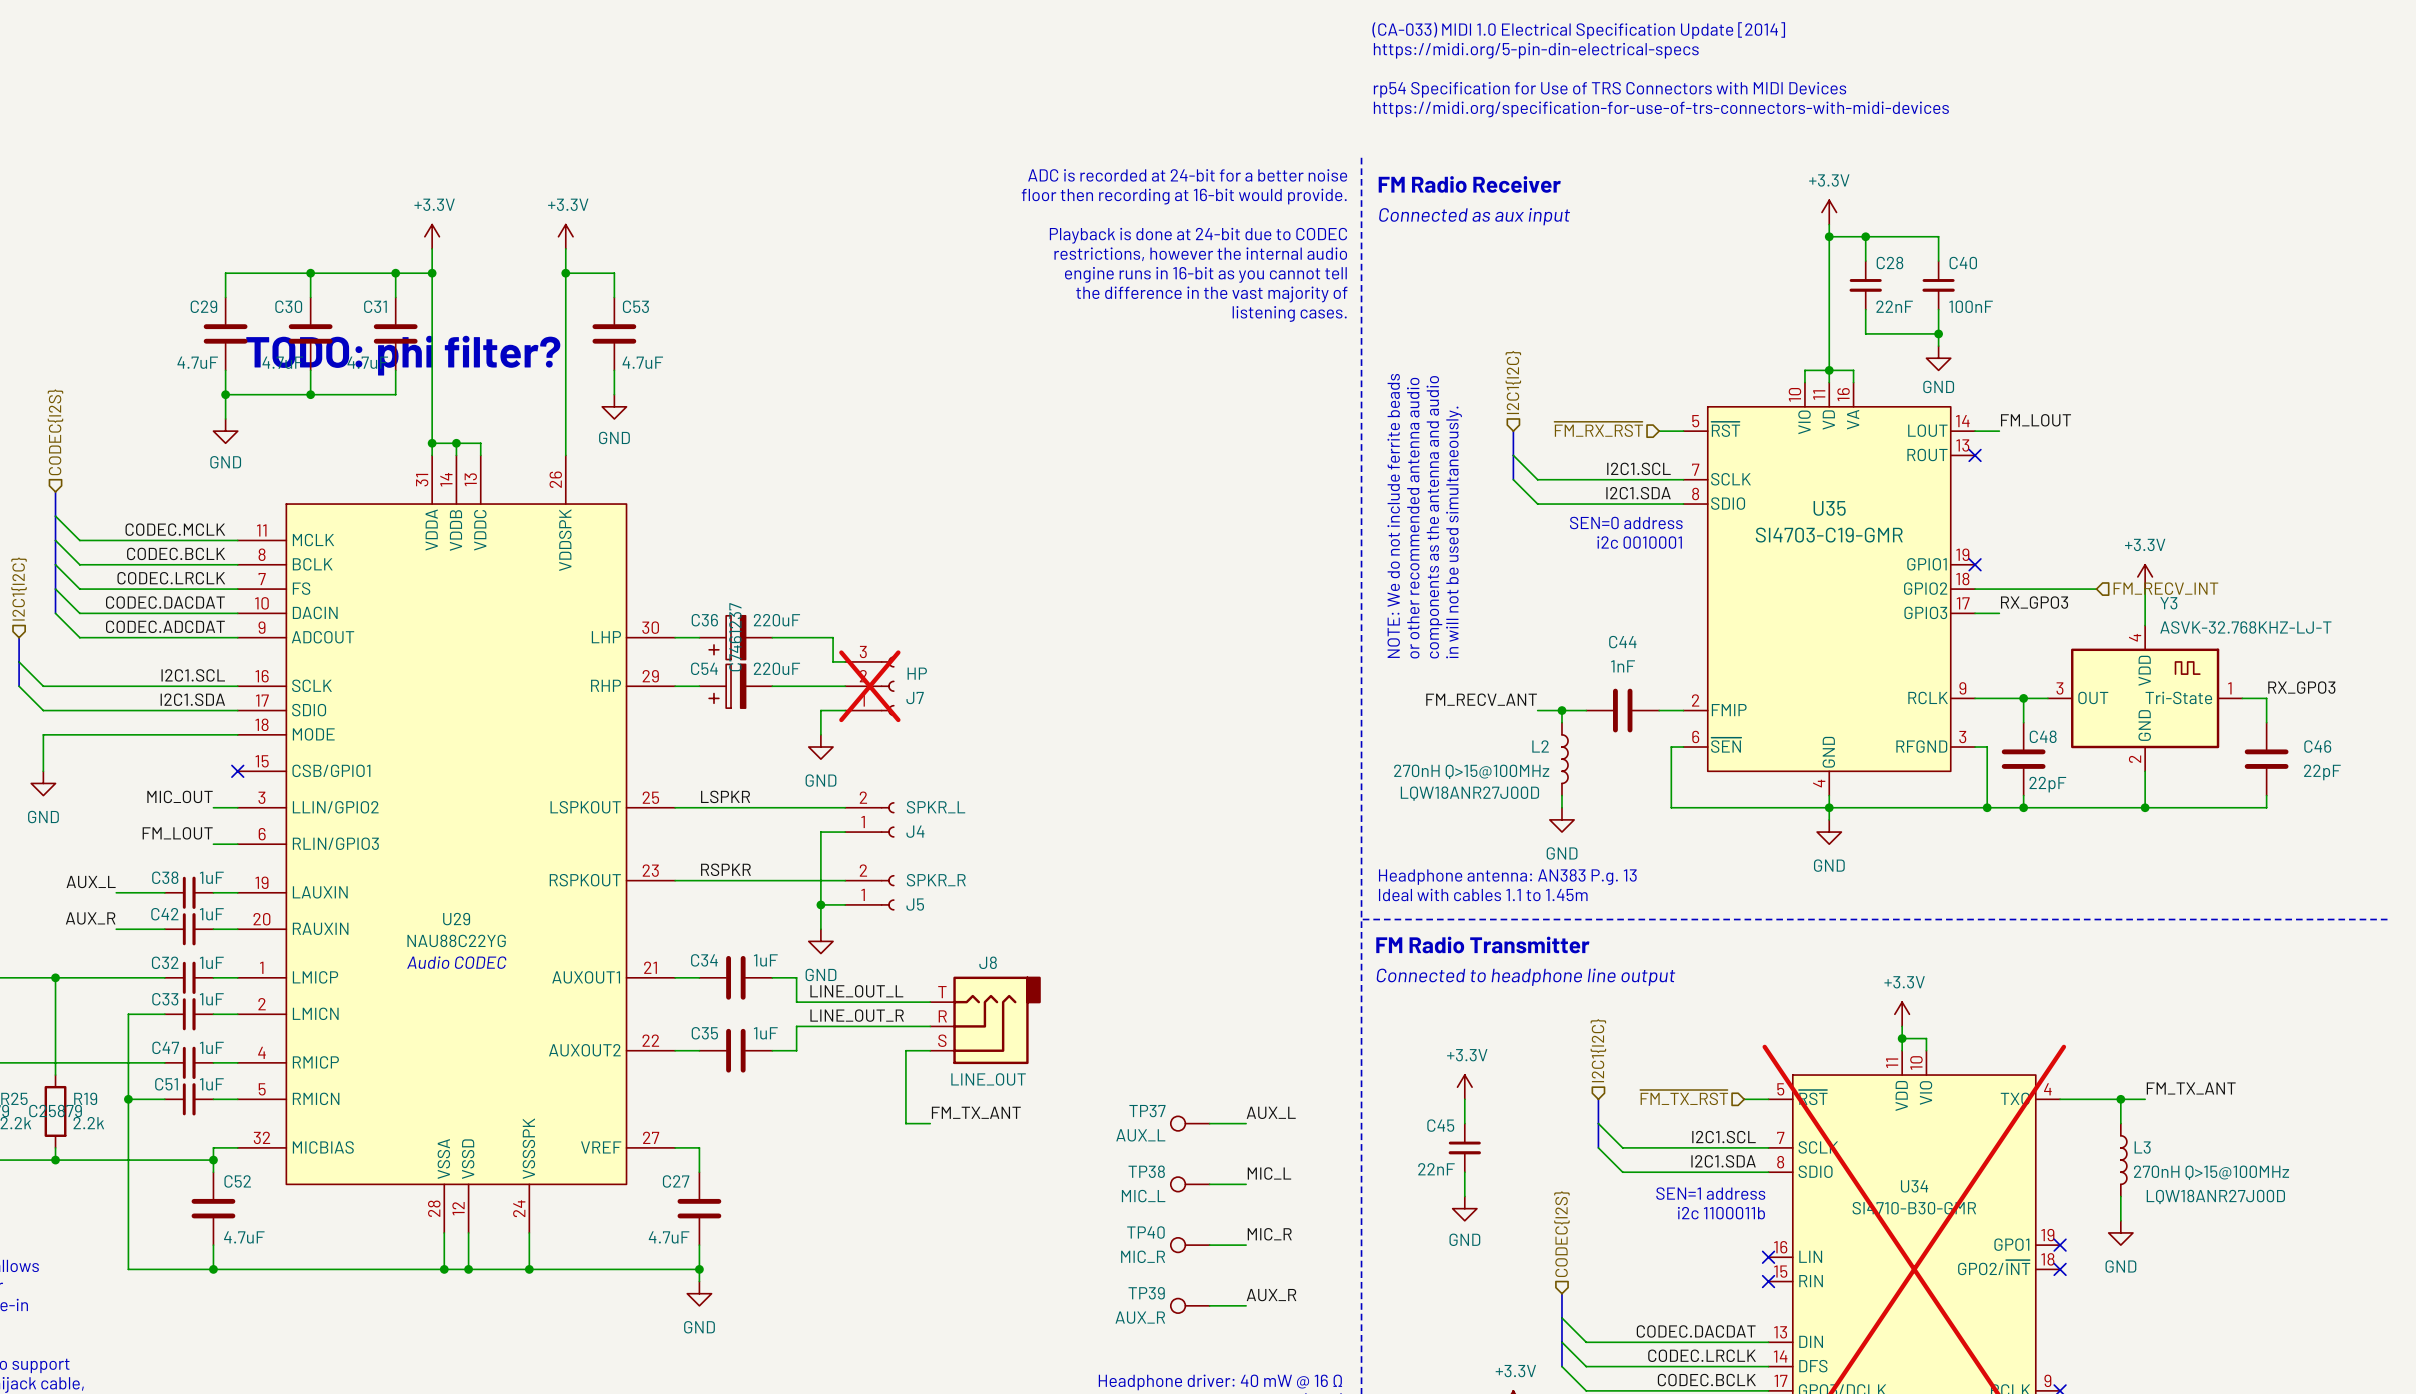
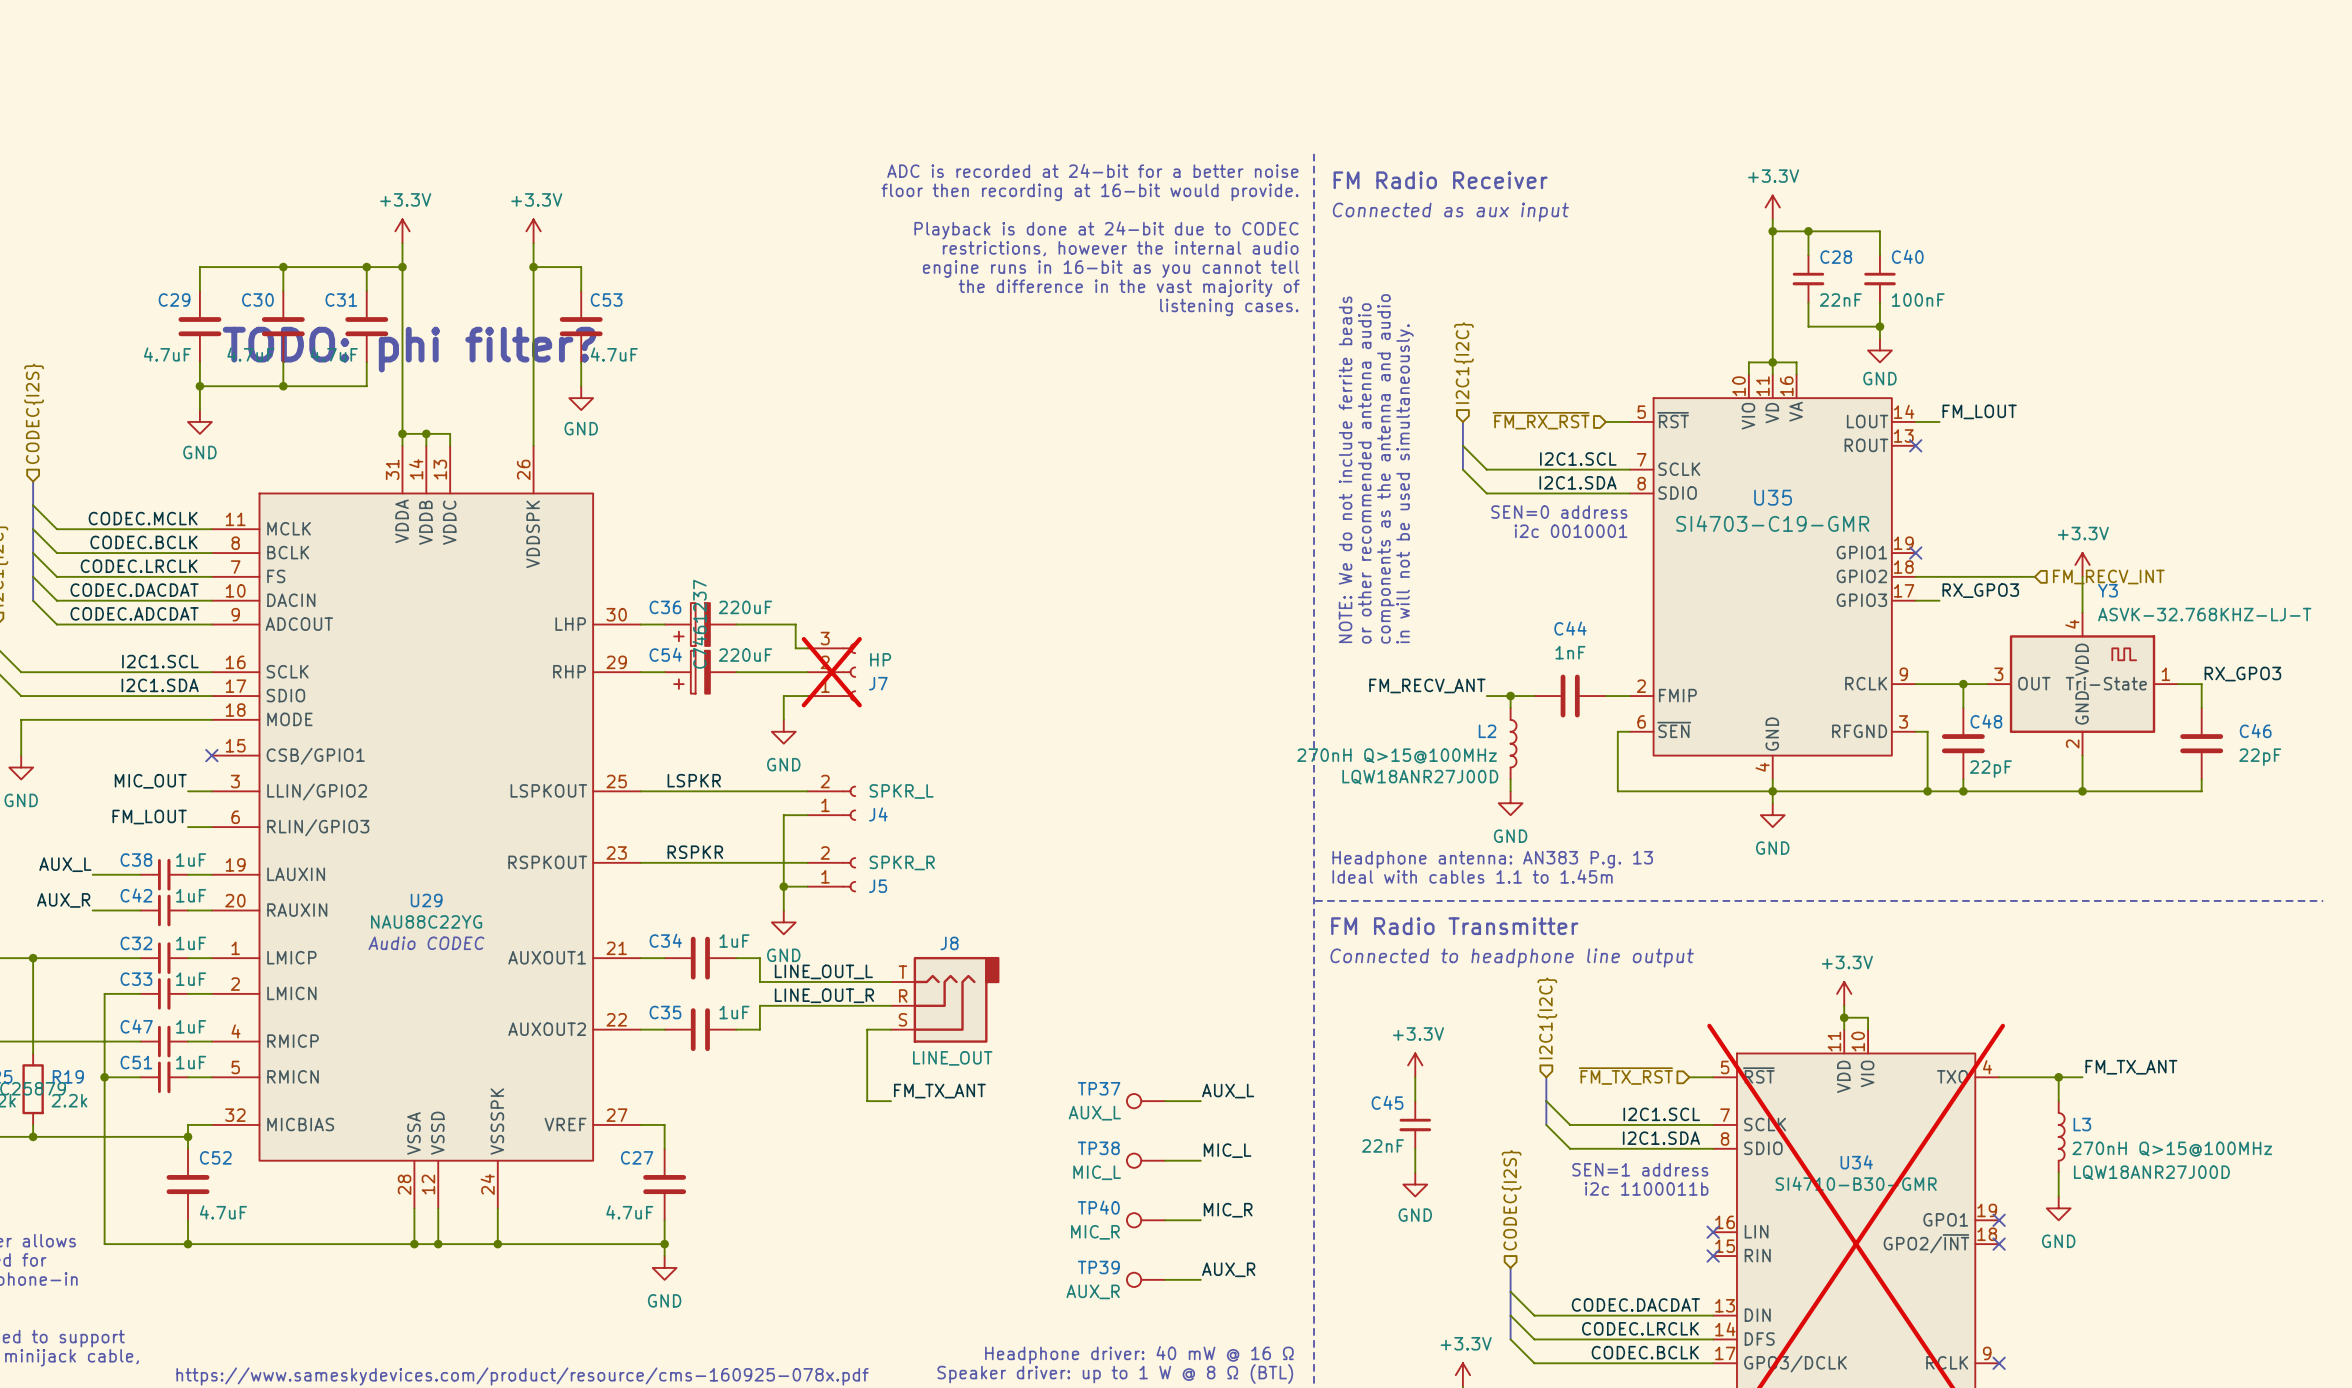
text: (CA-033) MIDI 1.0 Electrical Specification Update [2014] (1578, 30) -> none
text: https://midi.org/5-pin-din-electrical-specs (1536, 50) -> none
text: rp54 Specification for Use of TRS Connectors with MIDI Devices (1610, 89) -> none
text: https://midi.org/specification-for-use-of-trs-connectors-with-midi-devices (1661, 109) -> none

